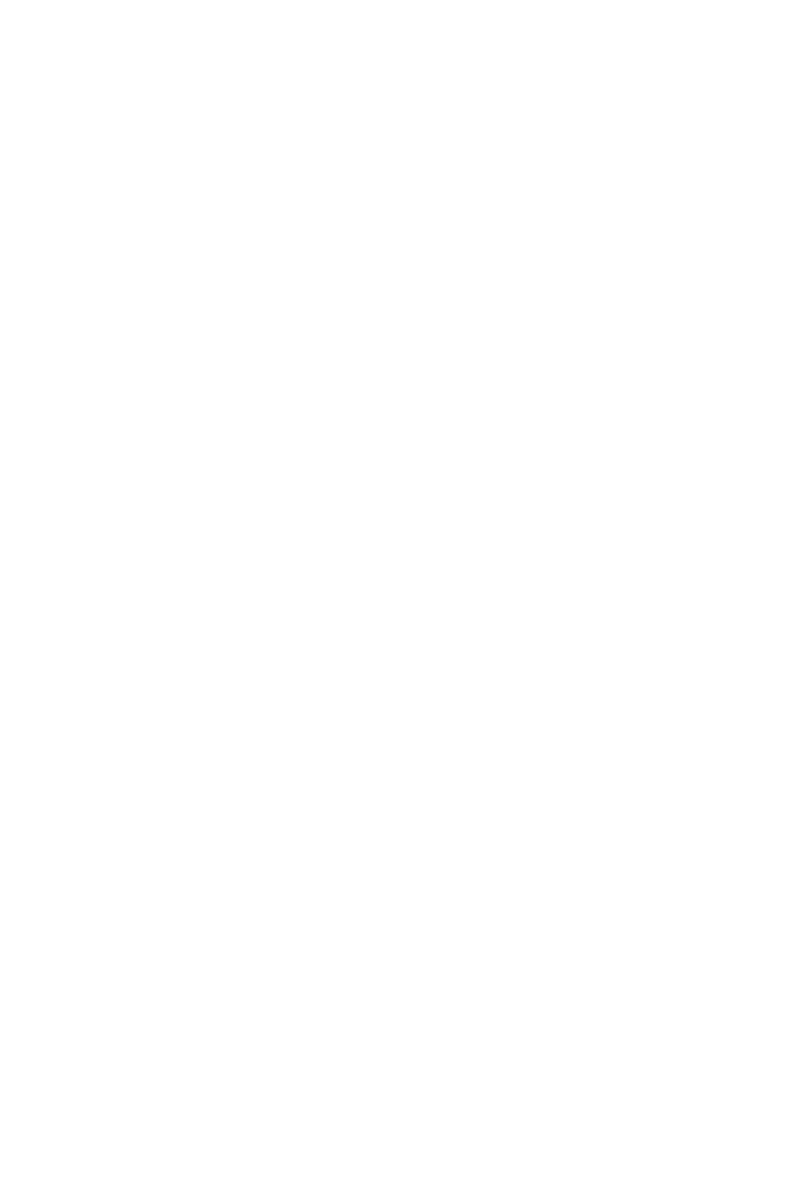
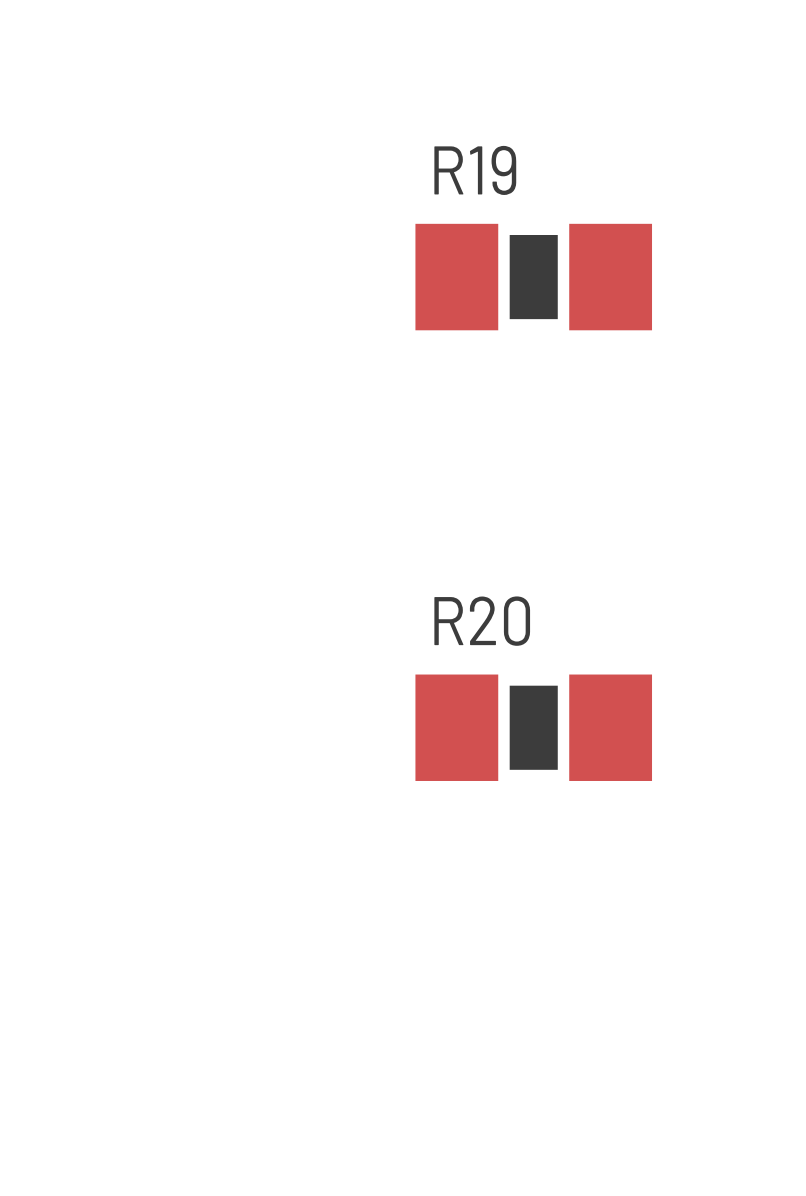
R19: none -> (533, 277)
R20: none -> (533, 727)

